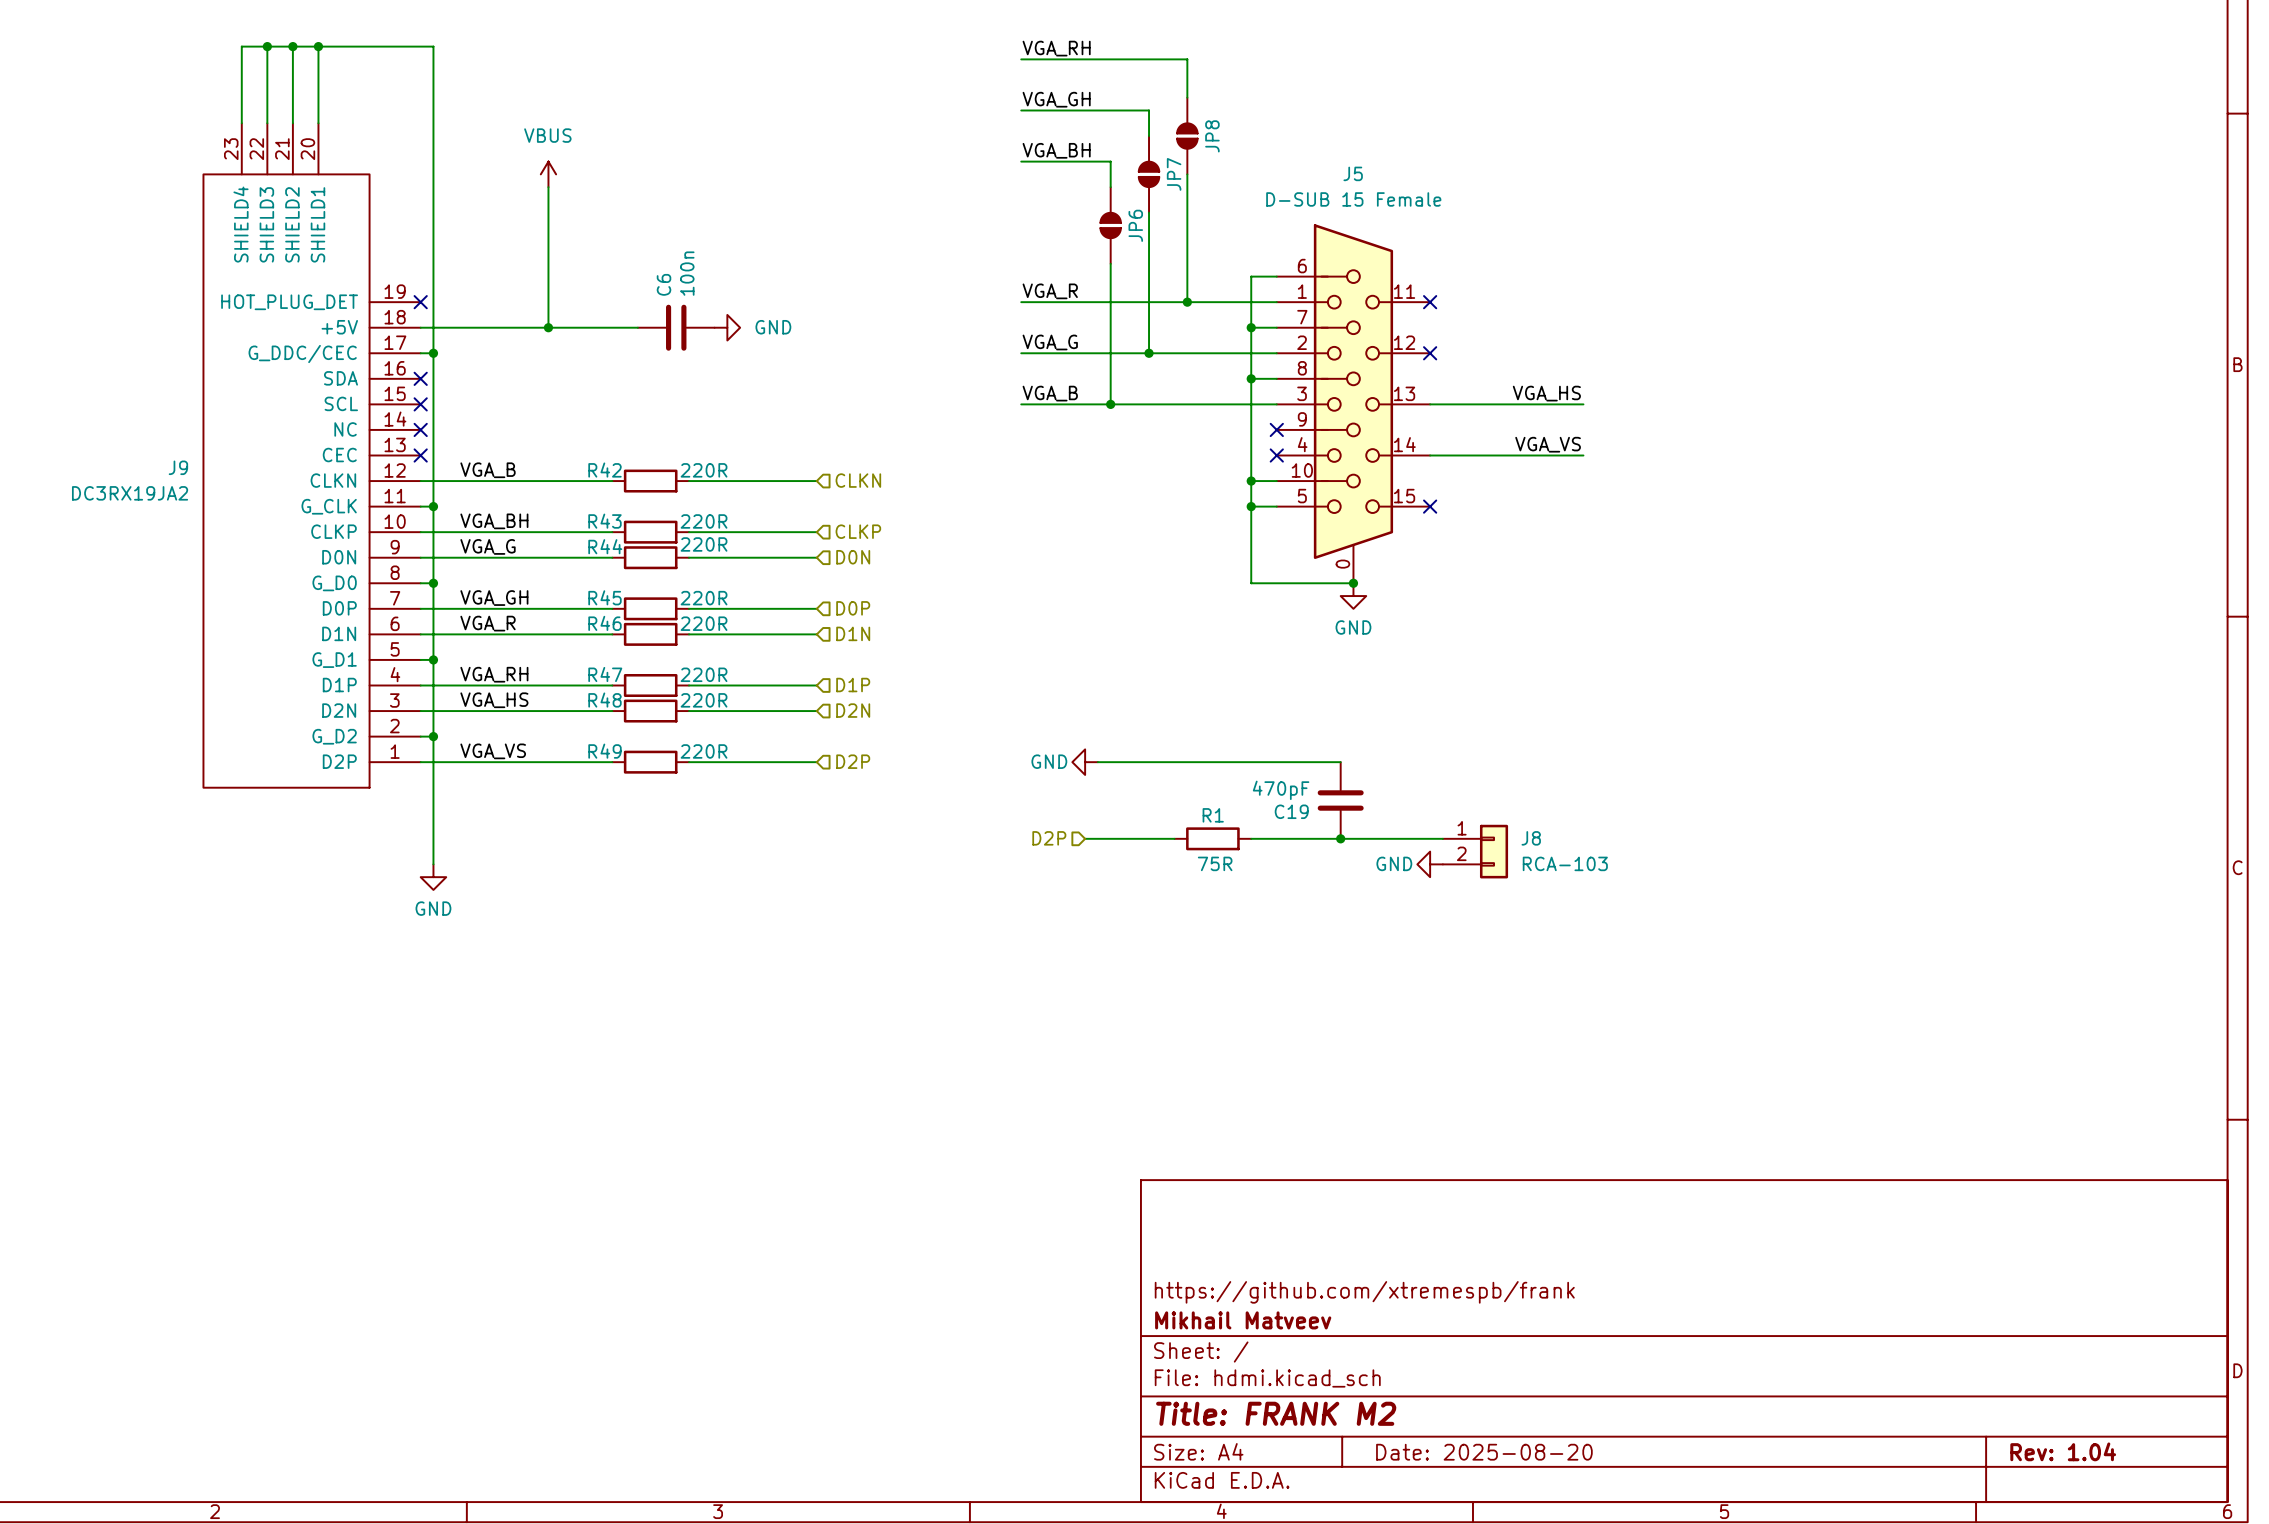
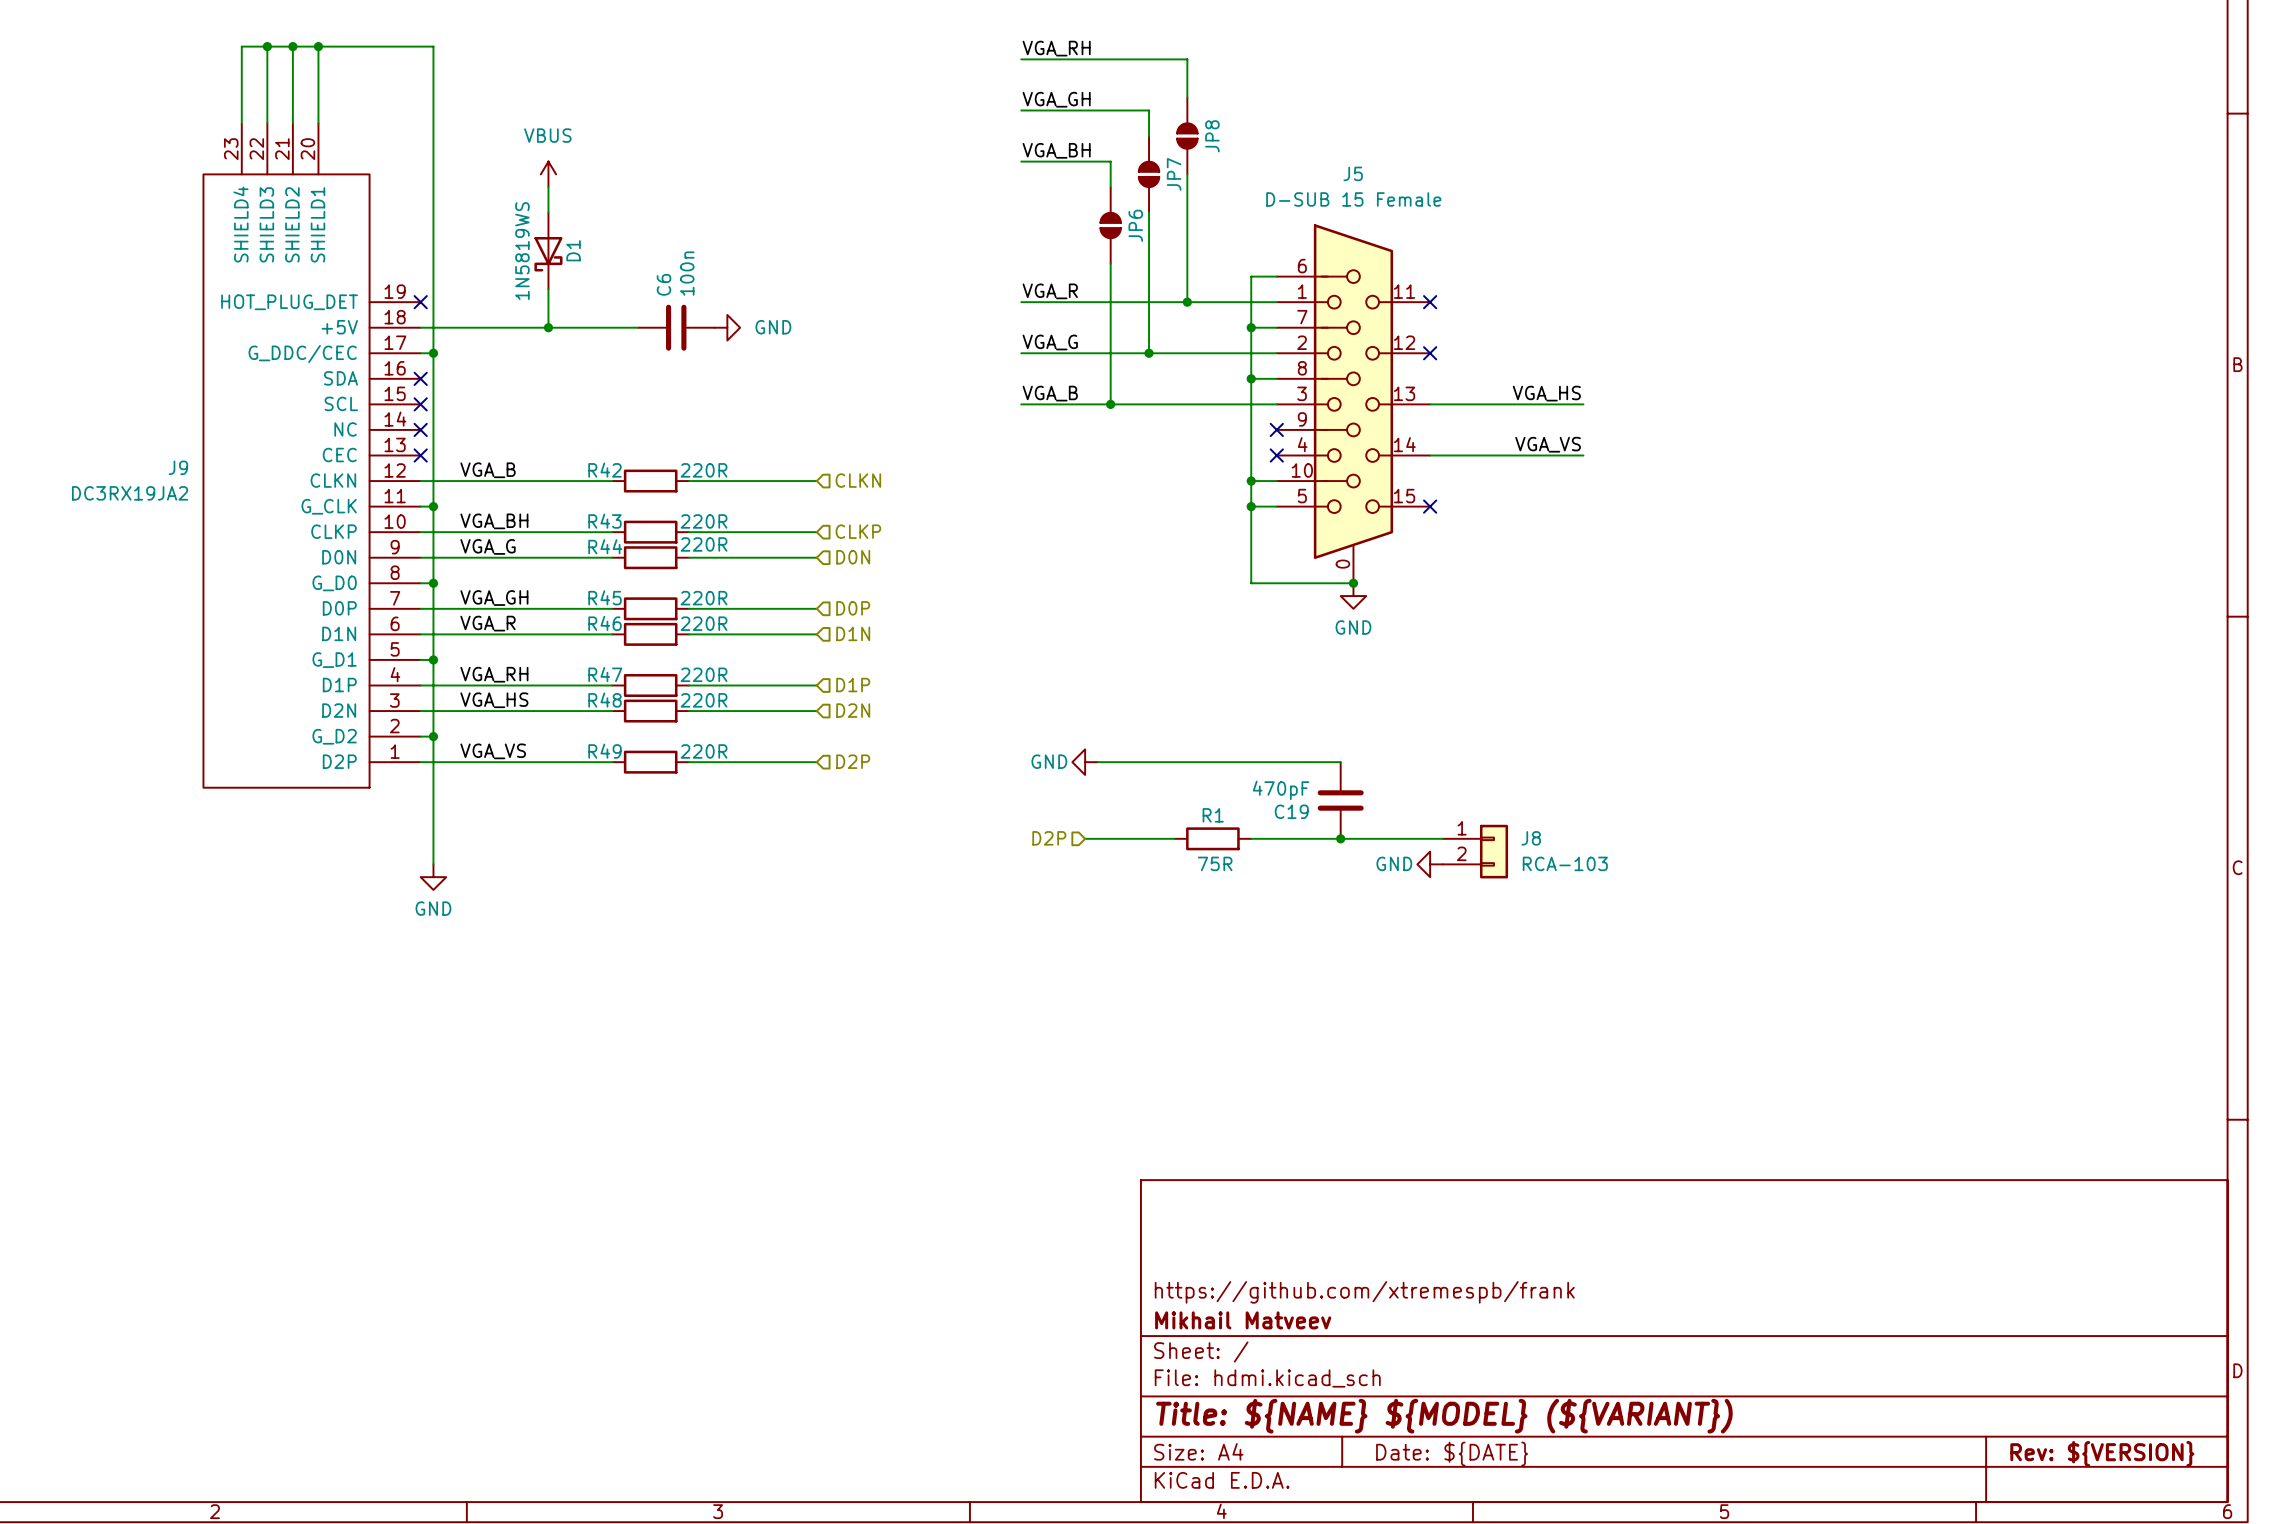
D1: none -> 1N5819WS (548, 251)
title block: Title: FRANK M2 (1276, 1413) -> Title: ${NAME} ${MODEL} (${VARIANT}) (1444, 1416)
title block: Rev: 1.04 (2063, 1451) -> Rev: ${VERSION} (2102, 1454)
title block: Date: 2025-08-20 (1484, 1452) -> Date: ${DATE} (1452, 1454)

